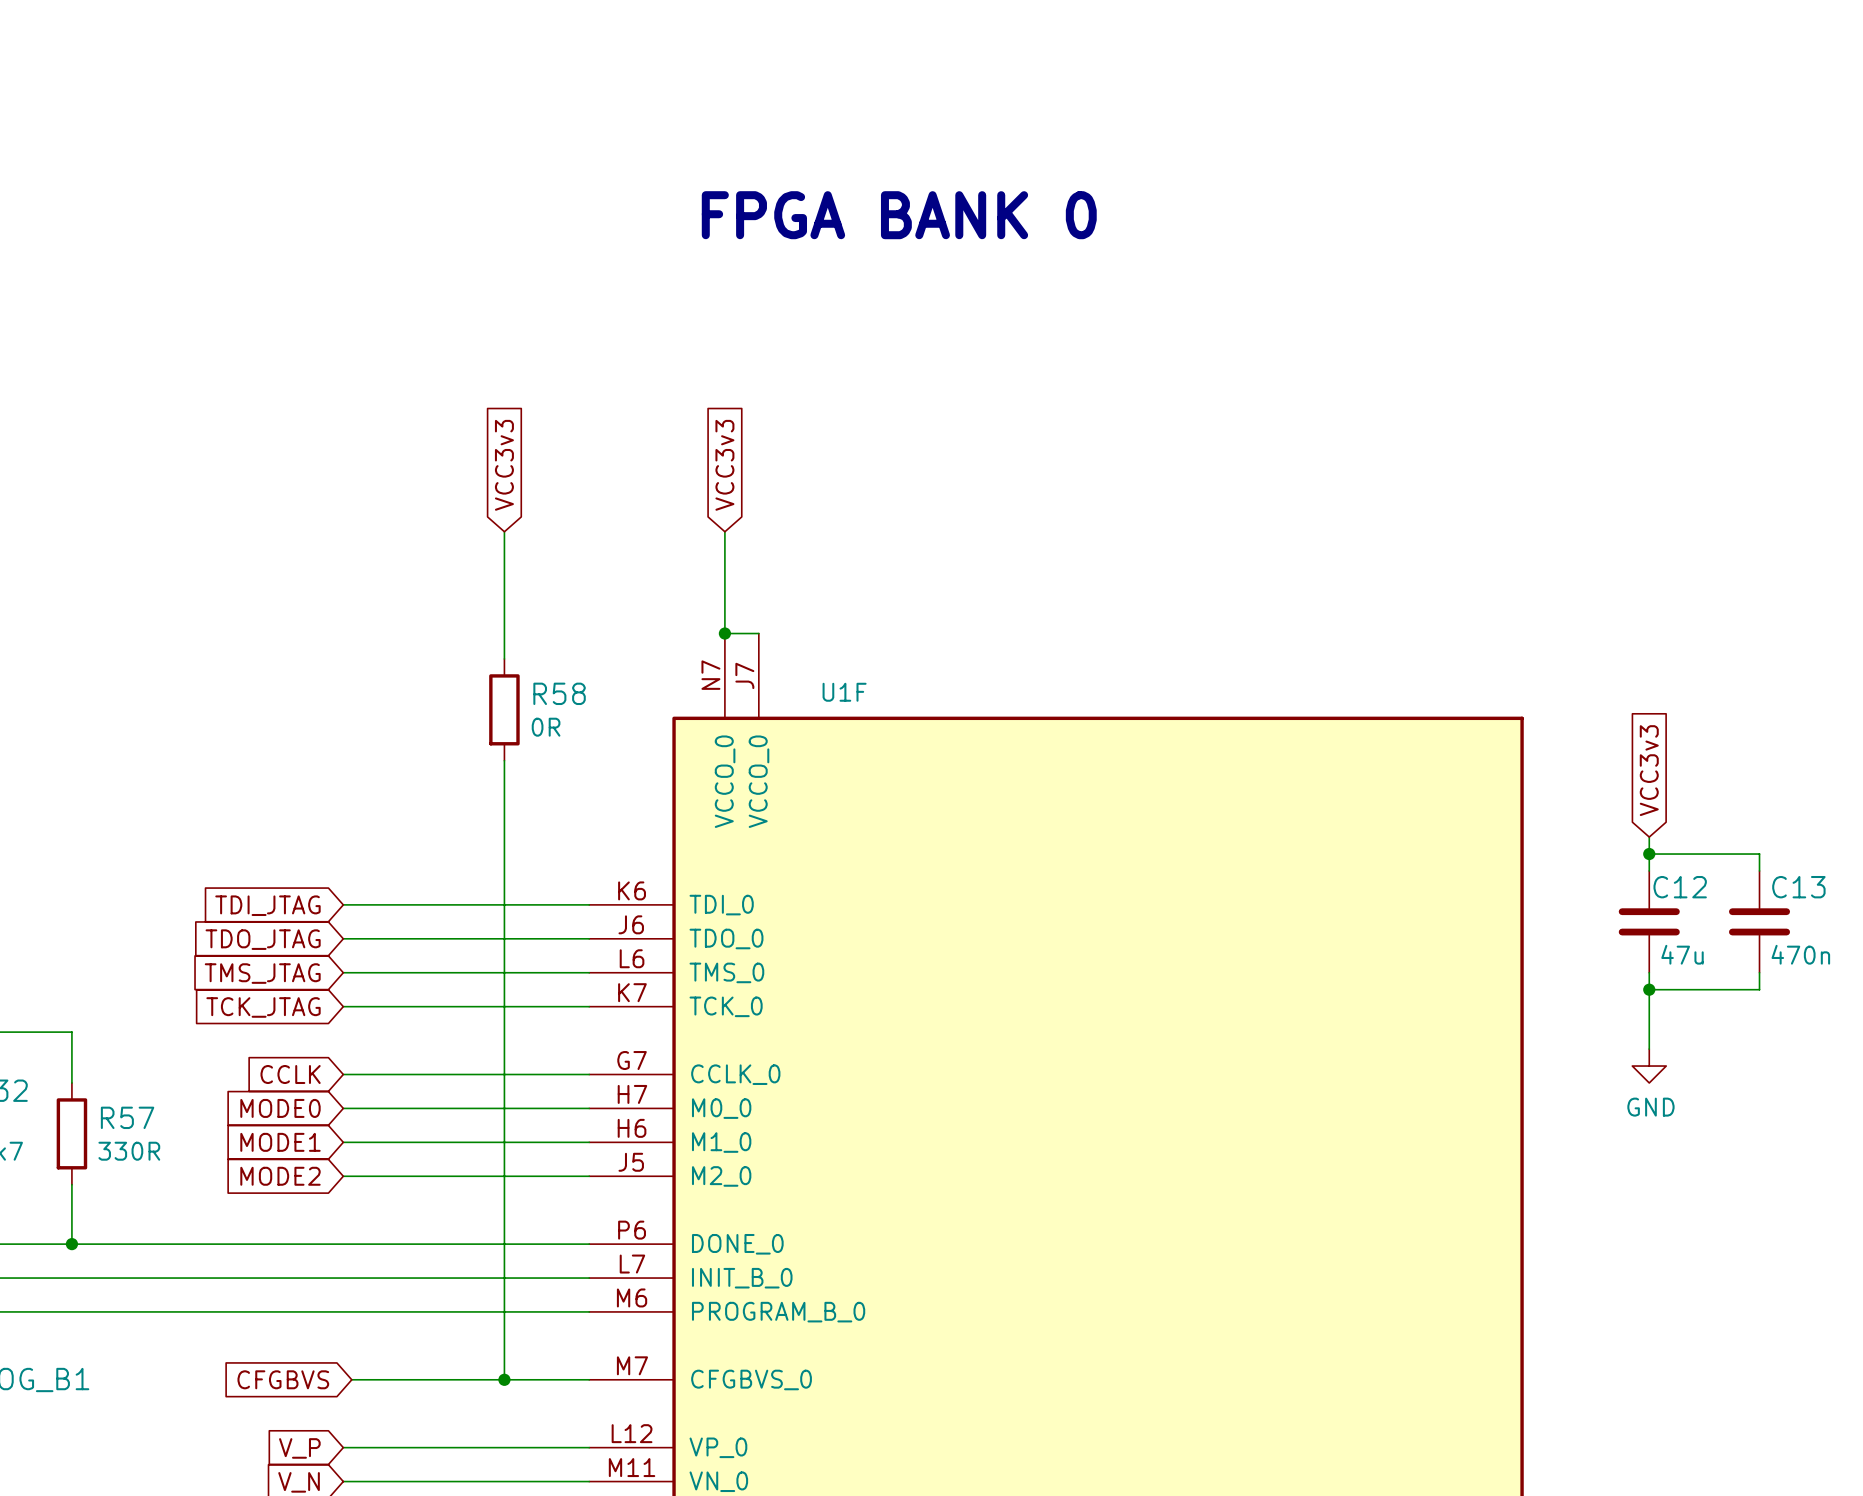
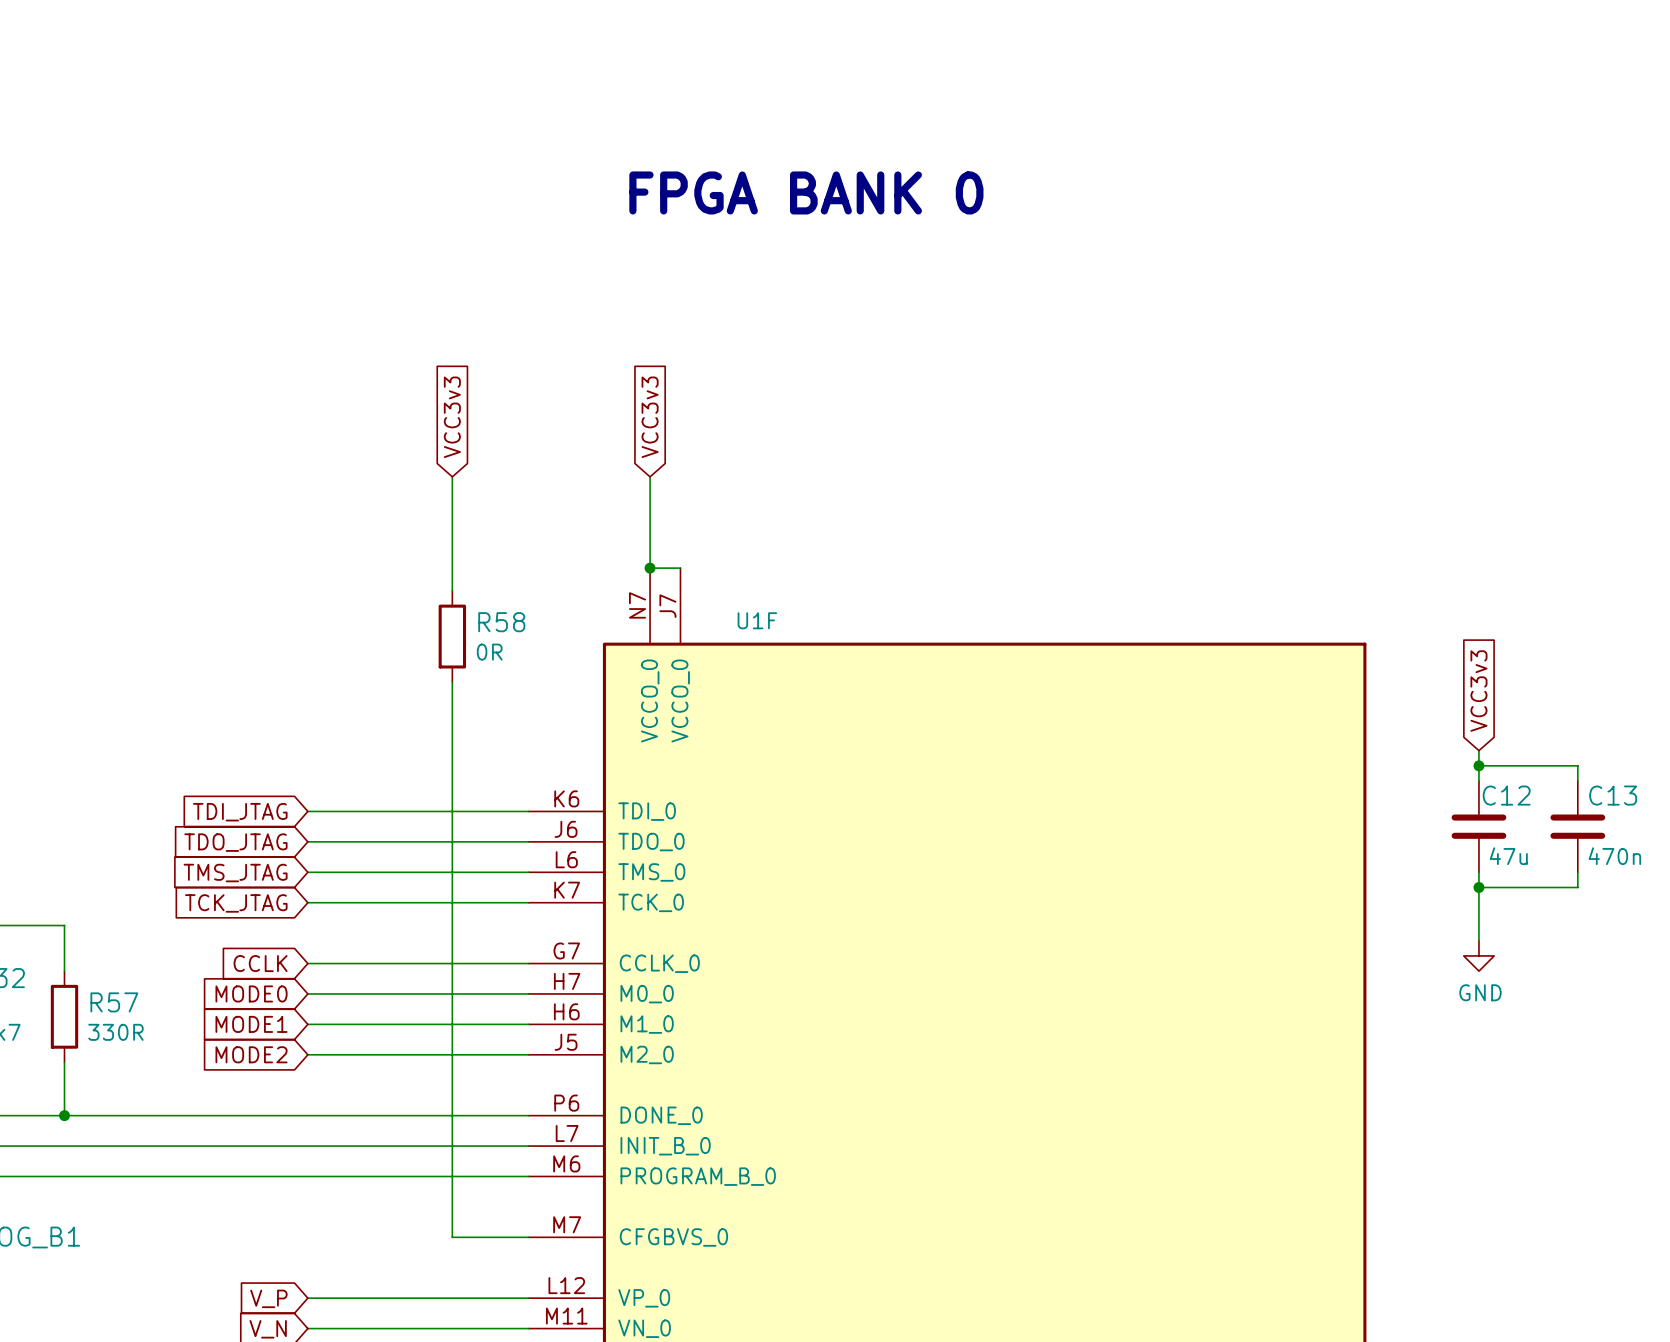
global label: CFGBVS (283, 1379) -> none
wire: (351, 1379) (504, 1379) -> none
junction: (504, 1379) -> none

